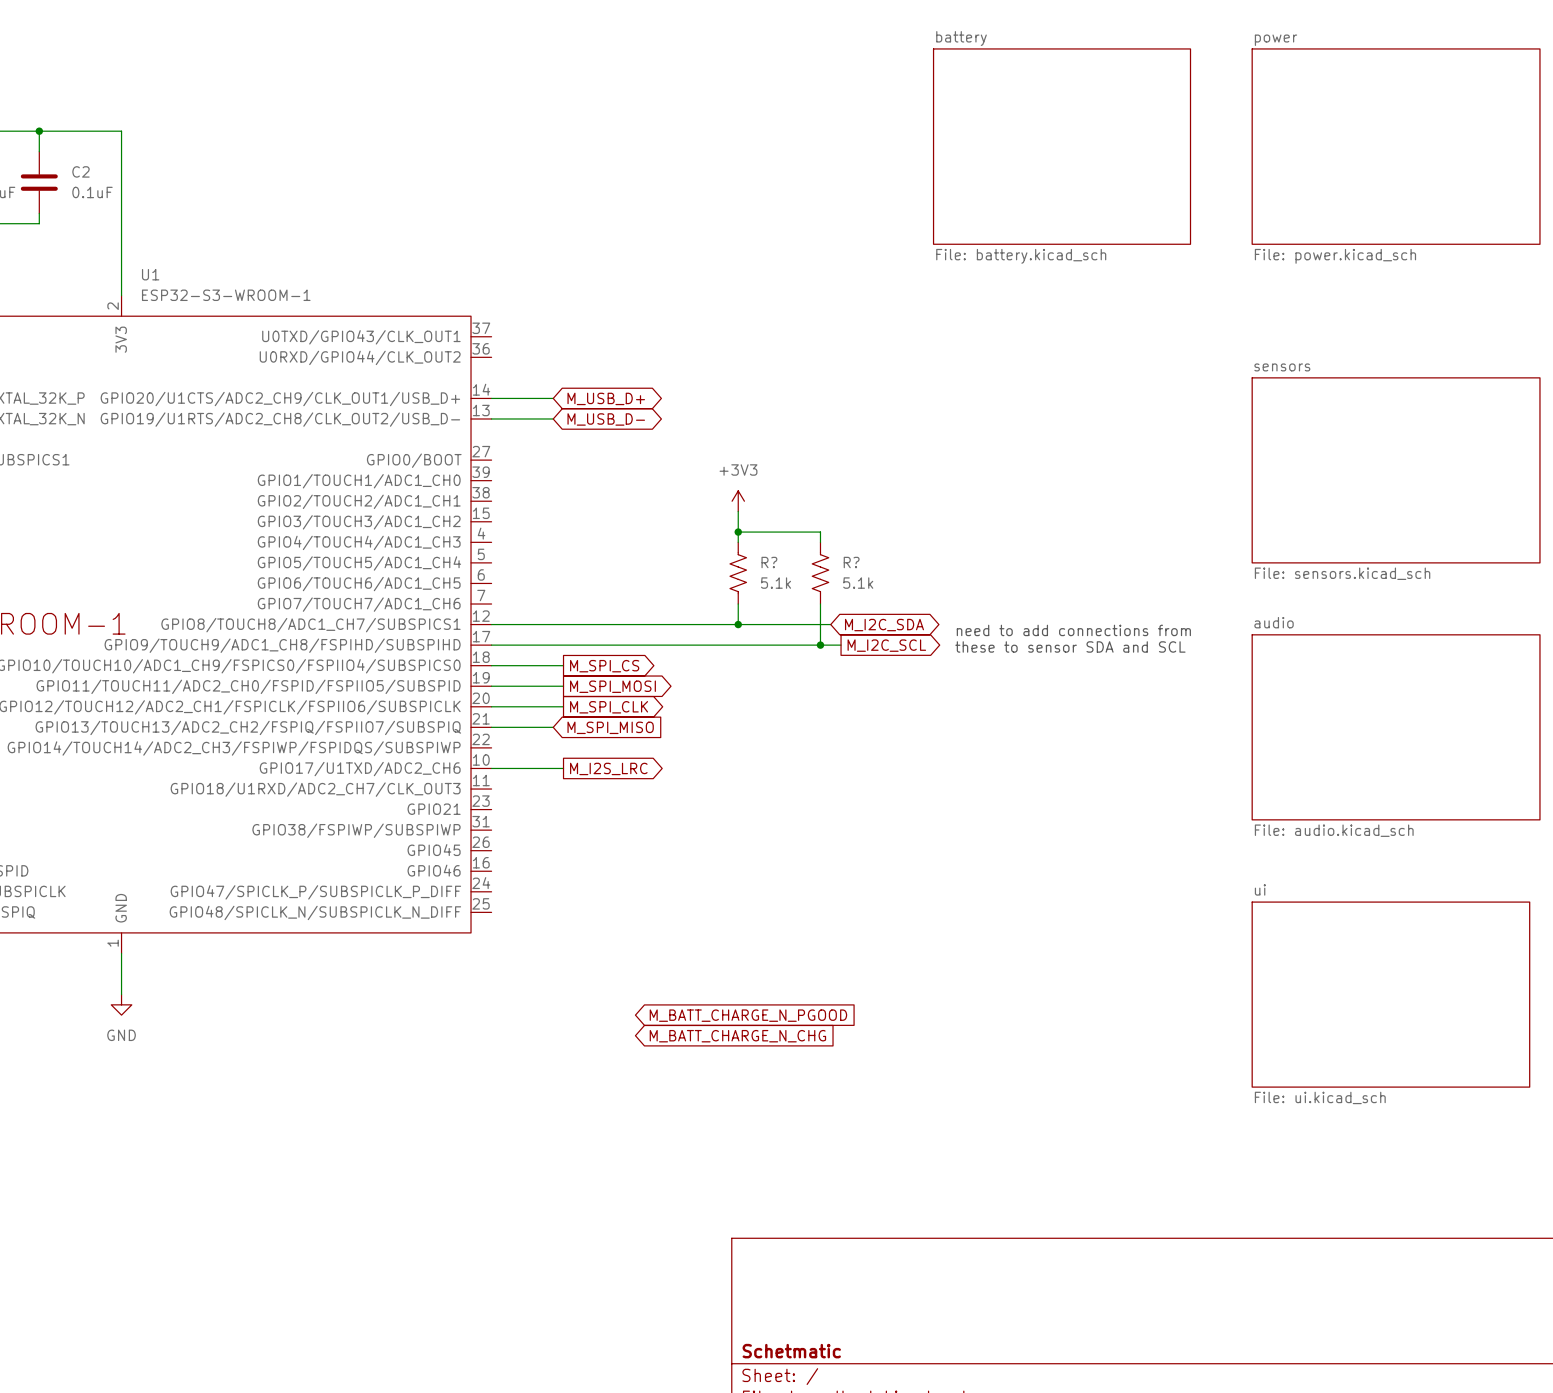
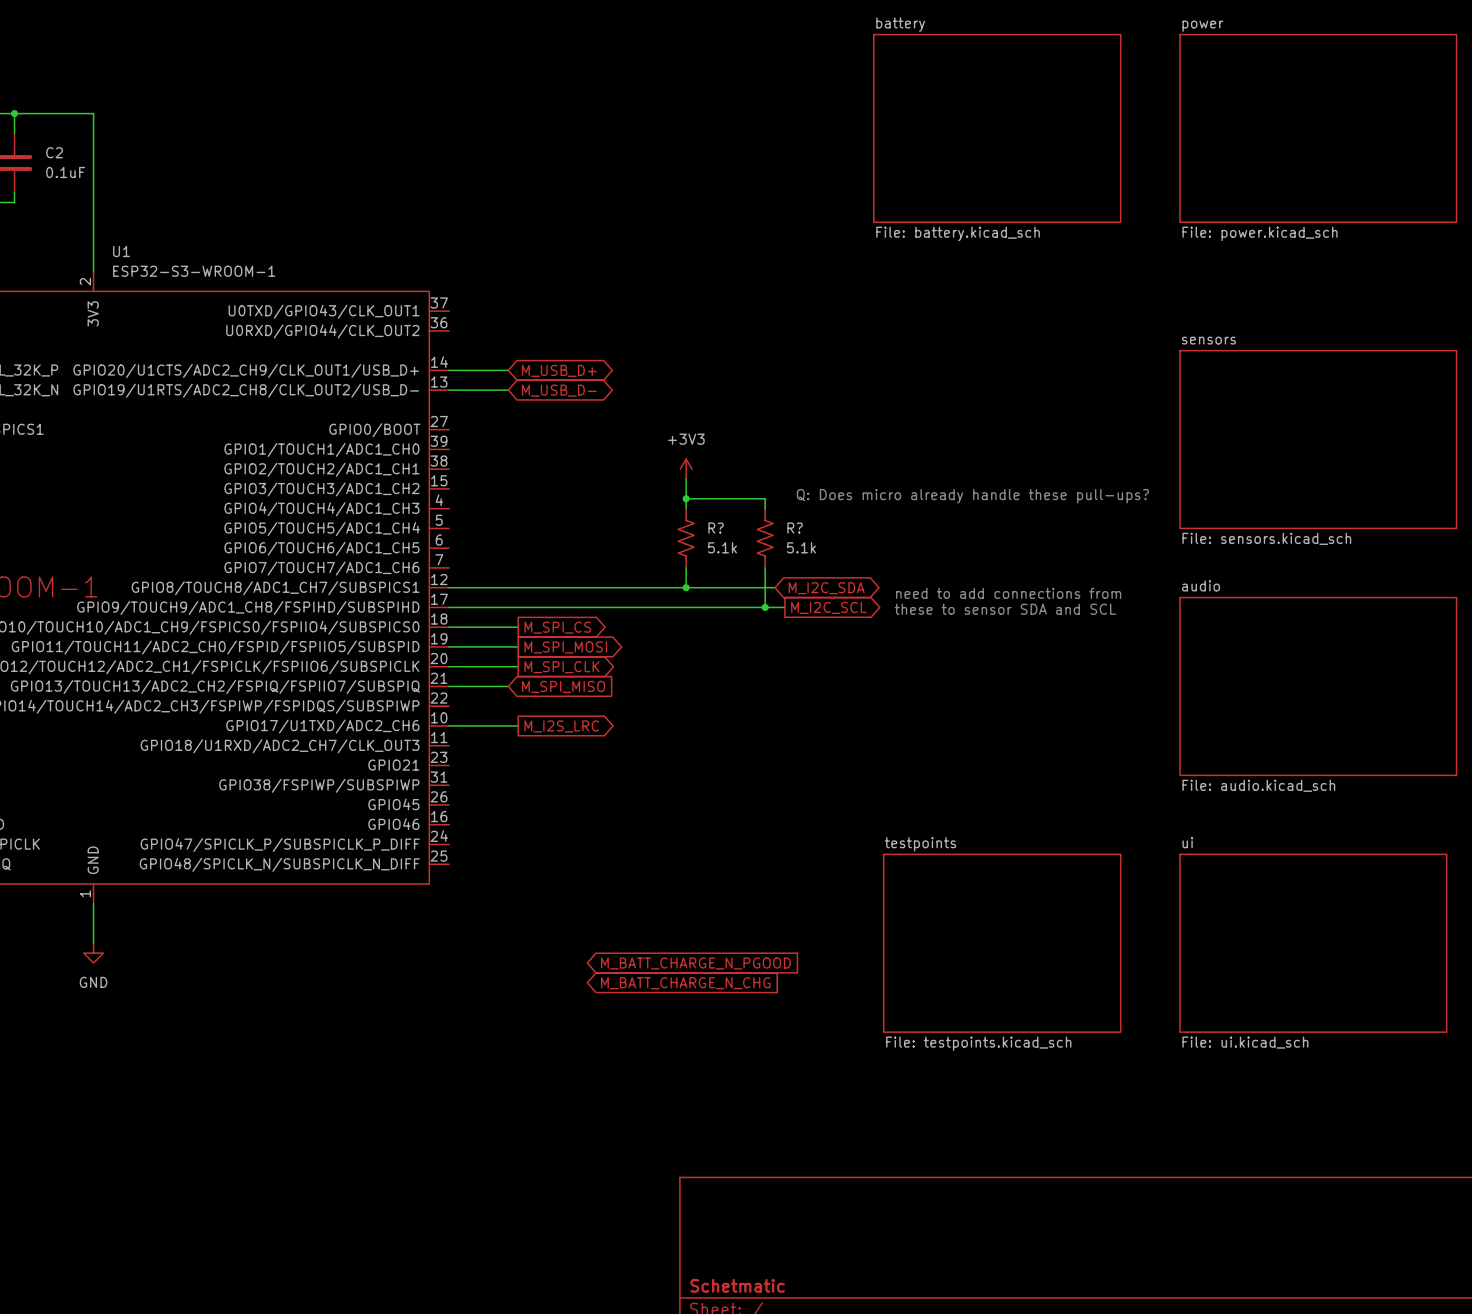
text: none -> Q: Does micro already handle these pull-ups? (972, 496)
sheet testpoints: none -> File: testpoints.kicad_sch (1002, 943)

